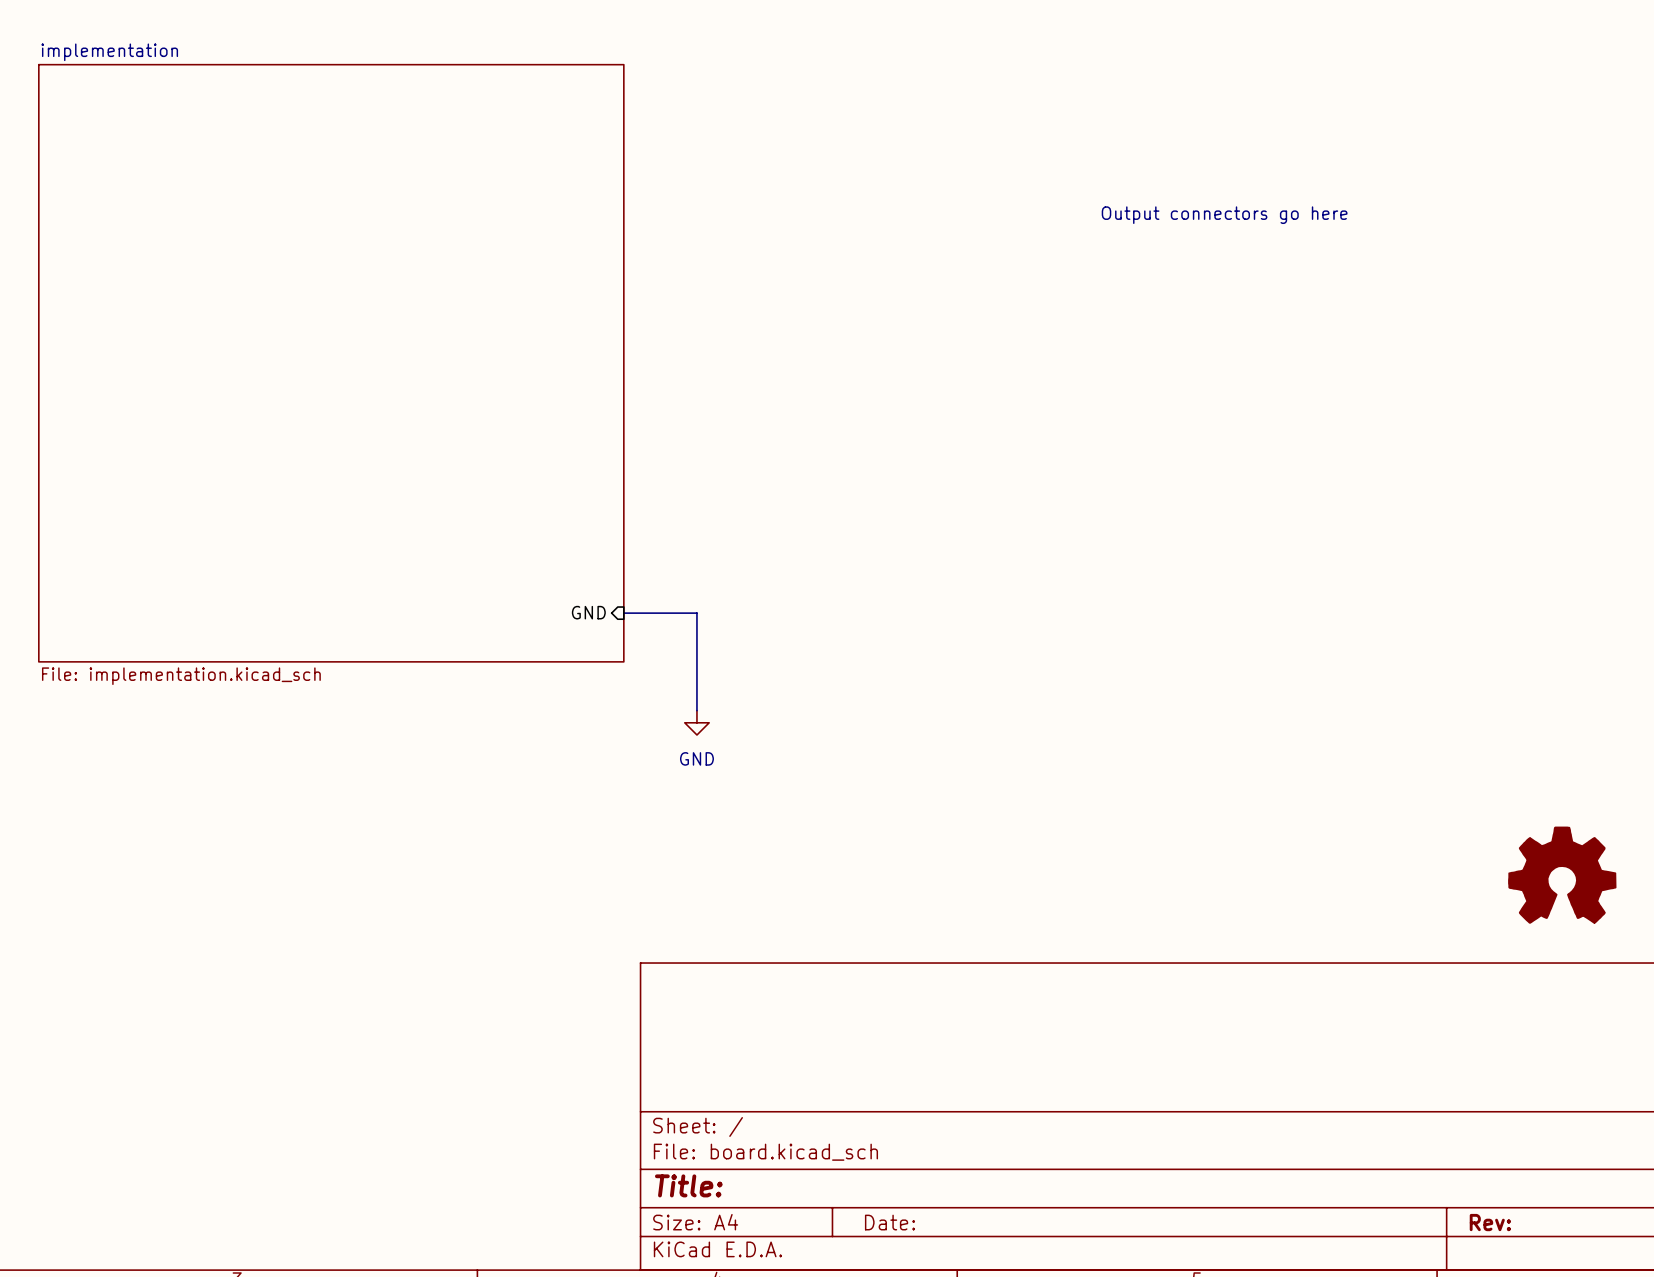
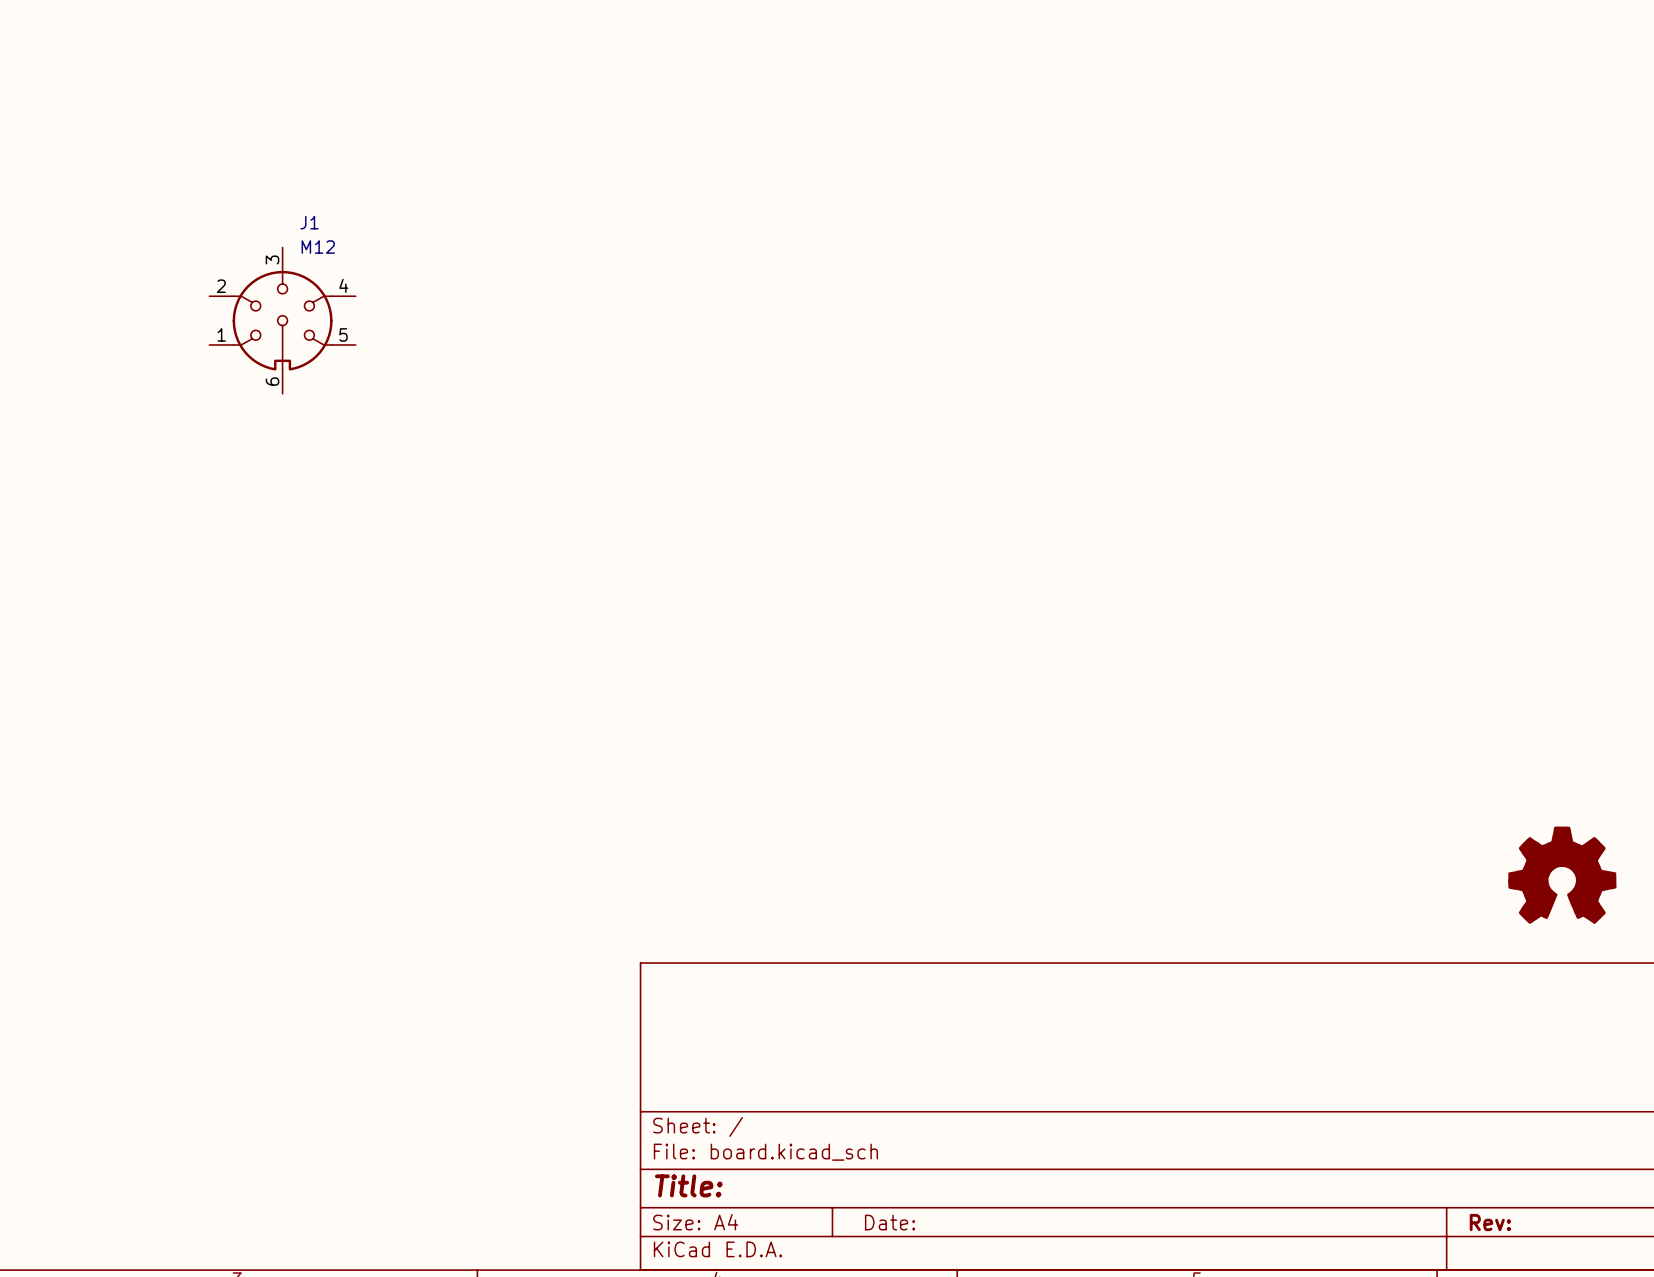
text: Output connectors go here (1224, 215) -> none
J1: none -> M12 (282, 320)
sheet implementation: File: implementation.kicad_sch (331, 363) -> none
sheet pin: GND (588, 612) -> none
wire: (623, 613) (696, 613) (696, 710) -> none
power symbol: GND (696, 722) -> none

